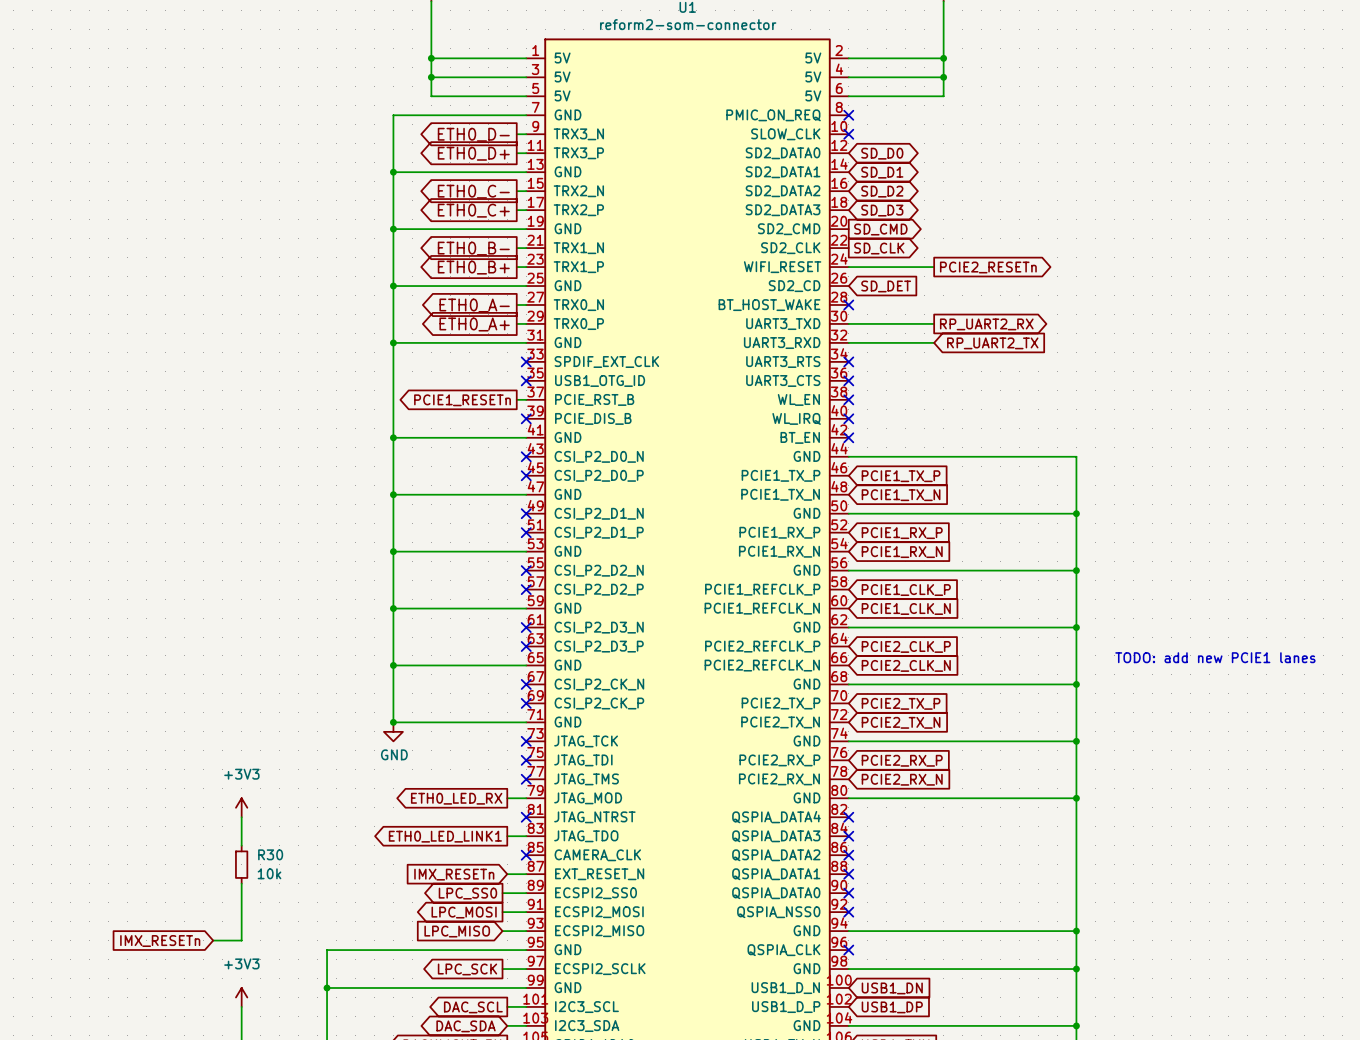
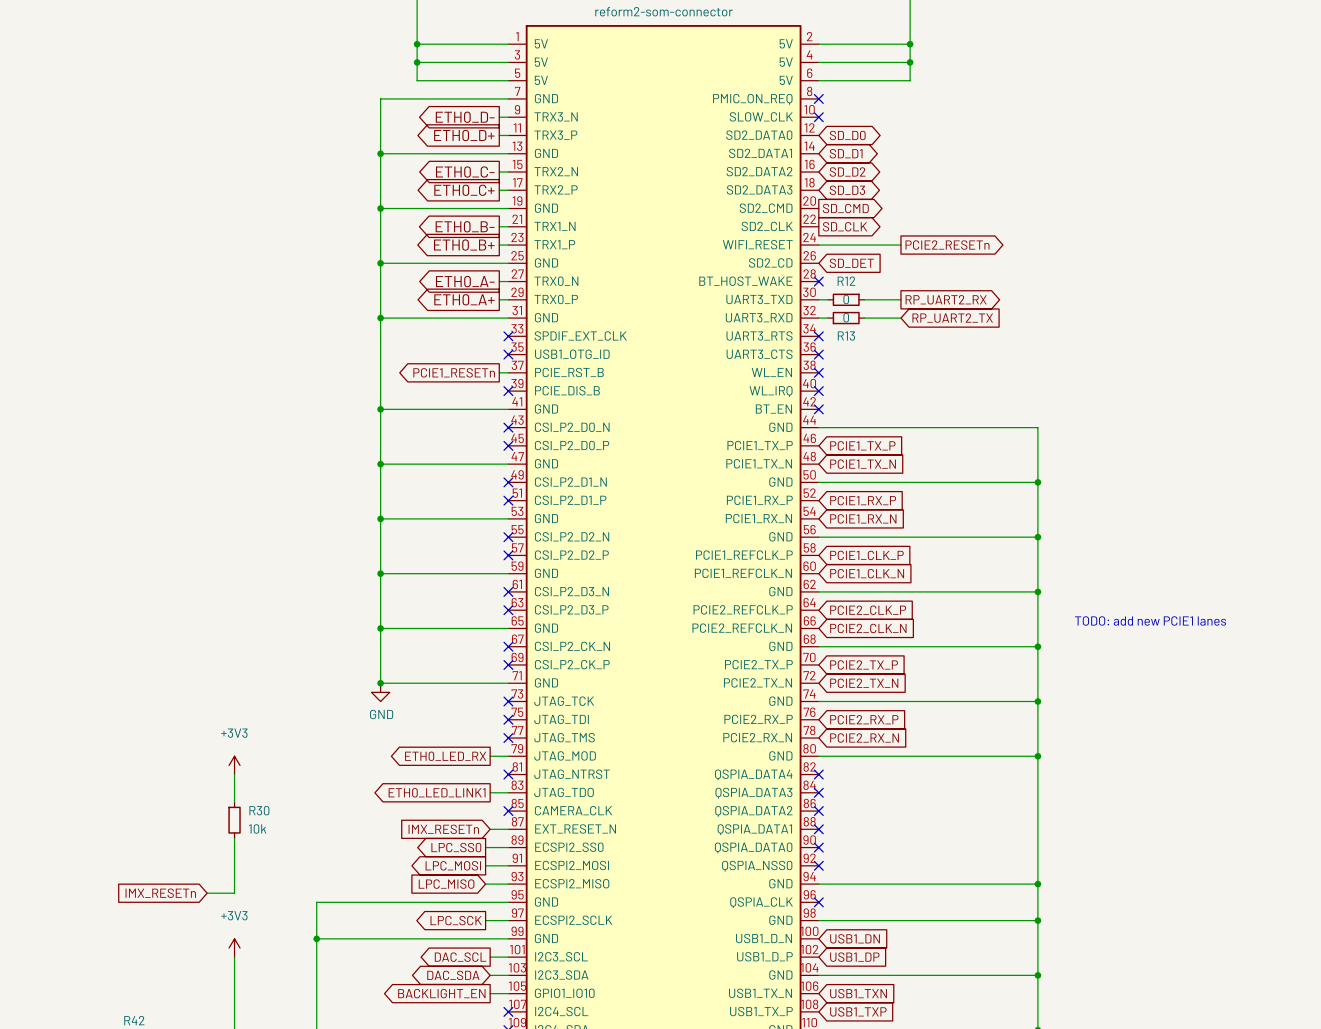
wire: (858, 323) (896, 323) -> none
R12: none -> 0 (846, 299)
wire: (858, 342) (896, 342) -> none
R13: none -> 0 (846, 318)

